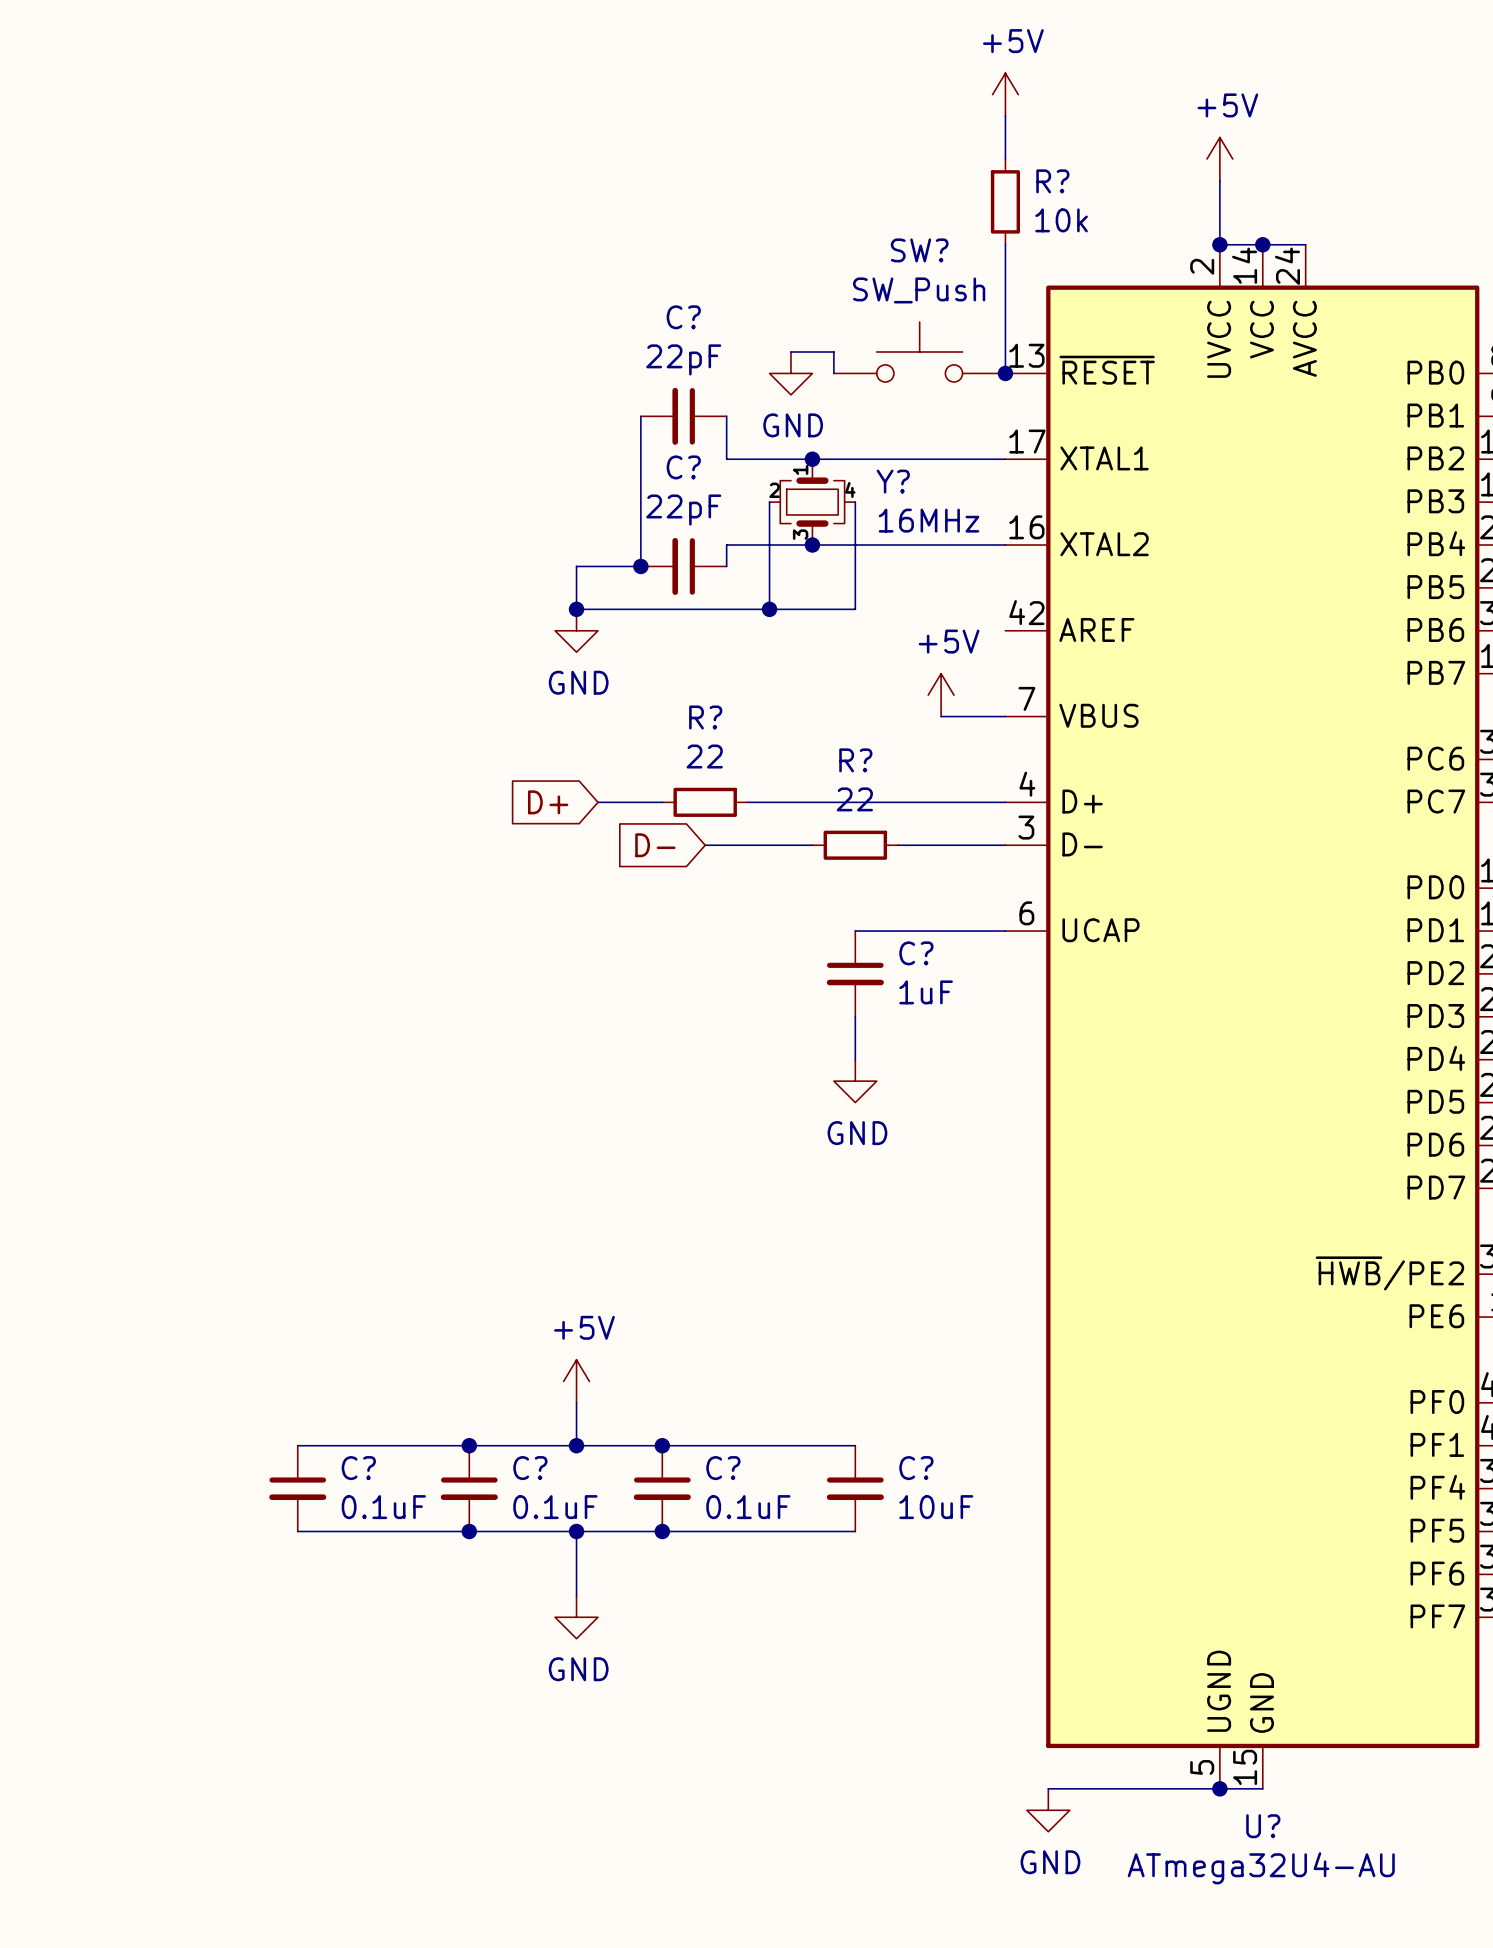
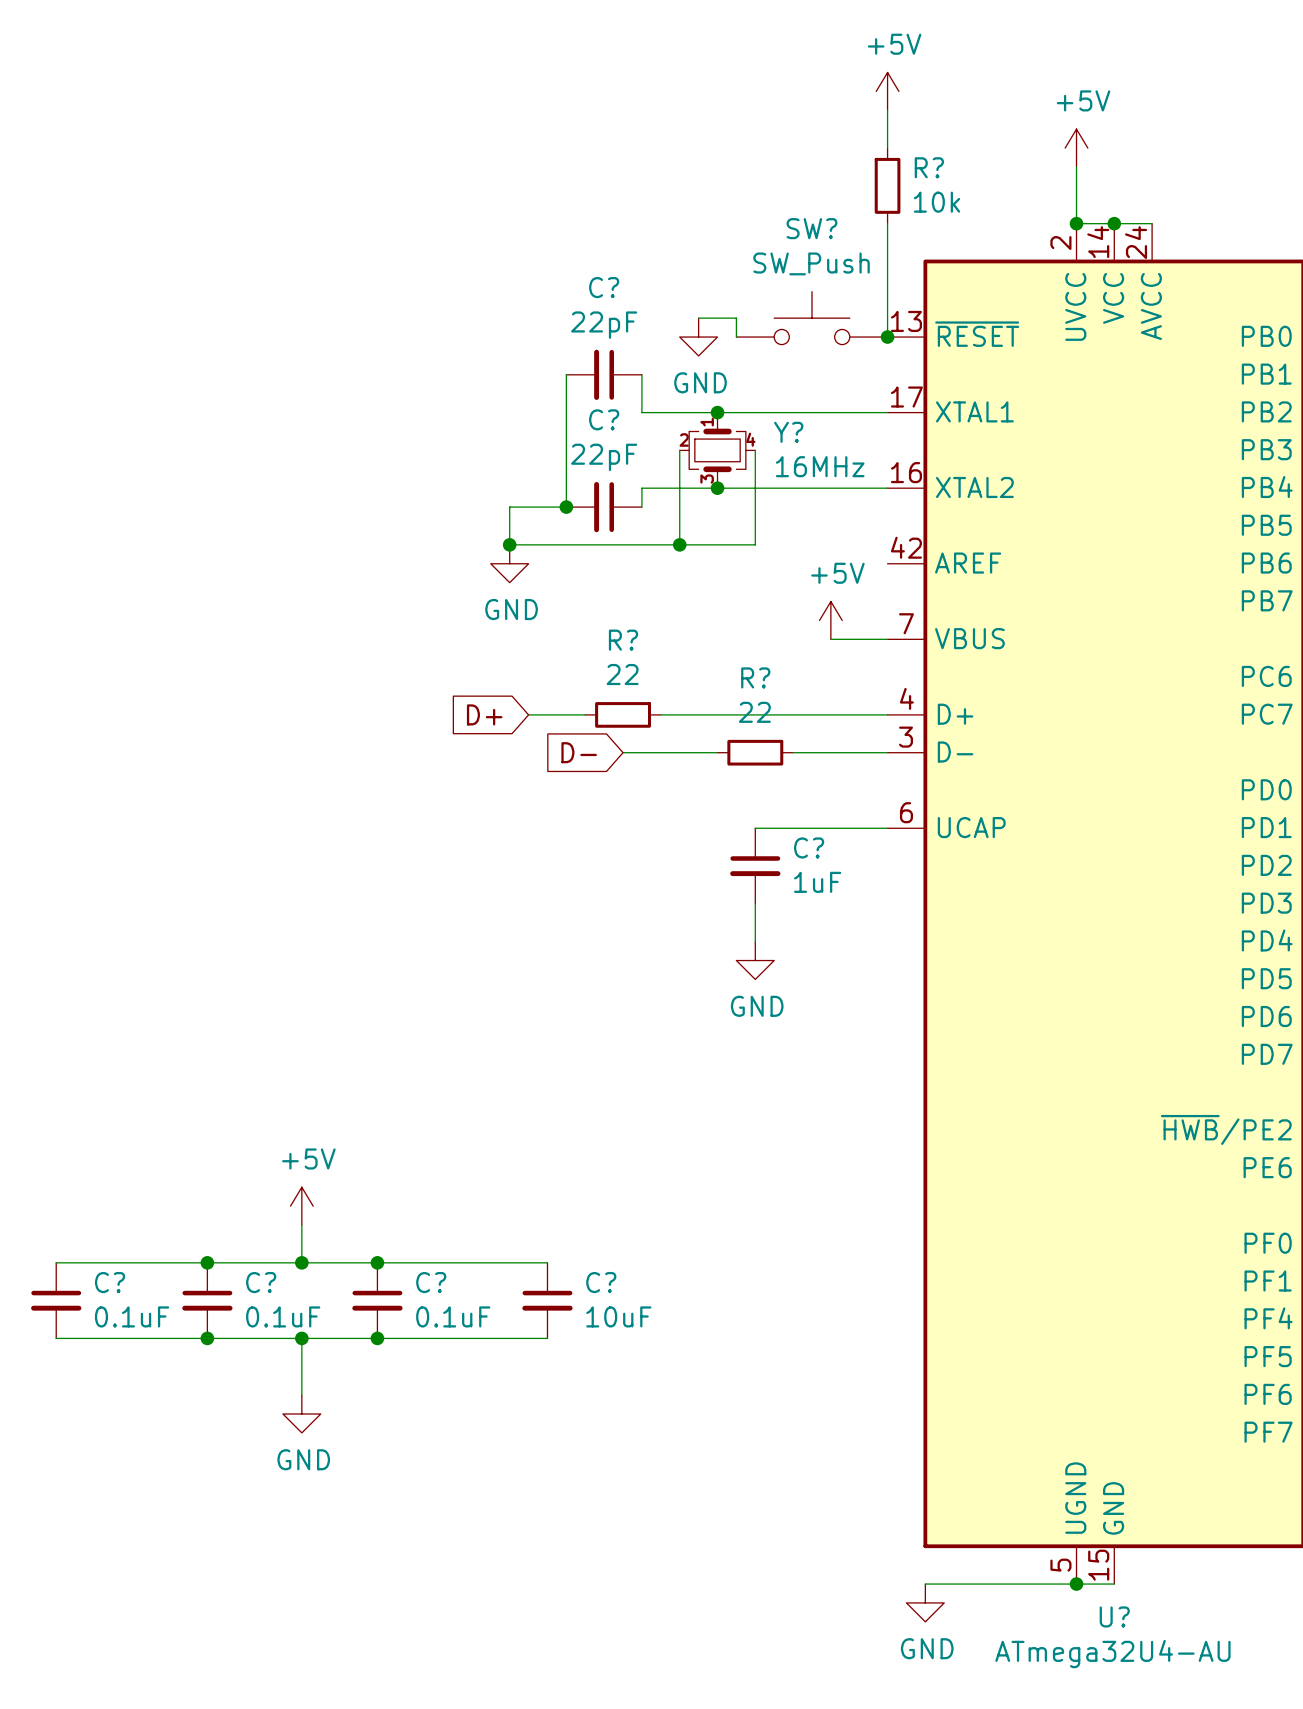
power symbol position: +5V (576, 1381) -> +5V (301, 1206)
wire: (576, 1402) (576, 1445) -> (301, 1225) (301, 1262)
junction: none -> (207, 1262)
junction: none -> (301, 1262)
junction: none -> (377, 1262)
wire: (297, 1445) (855, 1445) -> (56, 1262) (547, 1262)
junction: (469, 1445) -> none
junction: (576, 1445) -> none
junction: (662, 1445) -> none
C?: none -> 0.1uF (56, 1300)
C?: none -> 0.1uF (207, 1300)
C?: 0.1uF (297, 1488) -> none
C? position: (469, 1488) -> (377, 1300)
C?: 0.1uF (662, 1488) -> none
C? position: (855, 1488) -> (547, 1300)
junction: none -> (207, 1338)
junction: none -> (301, 1338)
junction: none -> (377, 1338)
wire: (297, 1531) (855, 1531) -> (56, 1338) (547, 1338)
junction: (469, 1531) -> none
wire: (576, 1531) (576, 1595) -> (301, 1338) (301, 1395)
junction: (576, 1531) -> none
junction: (662, 1531) -> none
power symbol position: GND (576, 1617) -> GND (301, 1413)

